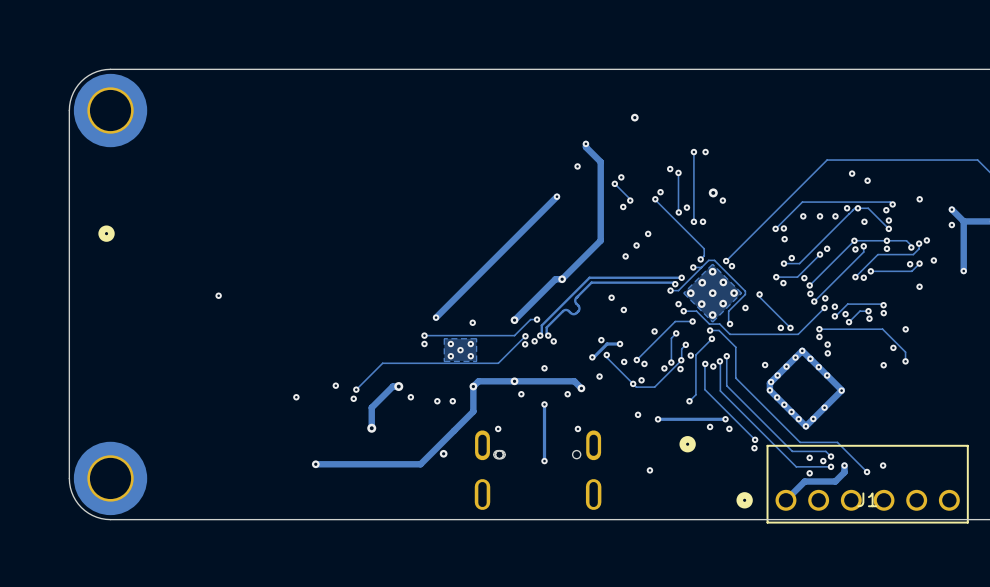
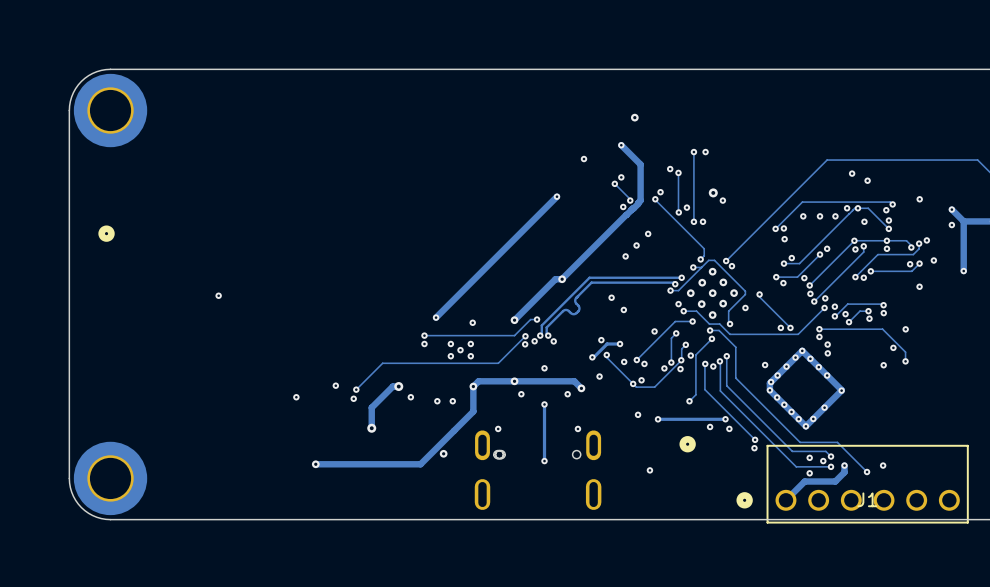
track: (585, 143) (585, 147) (600, 161) (600, 240) (562, 279) -> (621, 145) (640, 164) (640, 200) (562, 279)
via: (585, 143) -> none
via: none -> (621, 145)
via: none -> (584, 159)
via: (577, 166) -> none
zone outline: (712, 264) (741, 293) (712, 322) (683, 293) (712, 264) -> none
zone outline: (476, 338) (444, 338) (444, 361) (476, 361) (476, 338) -> none

